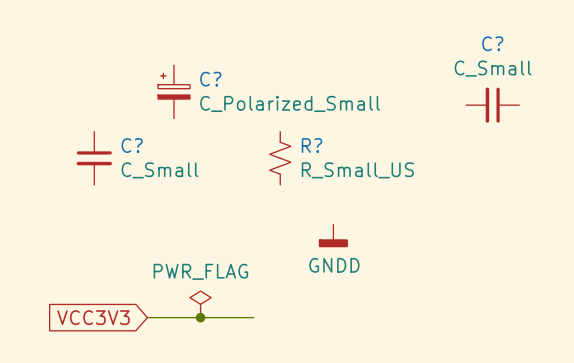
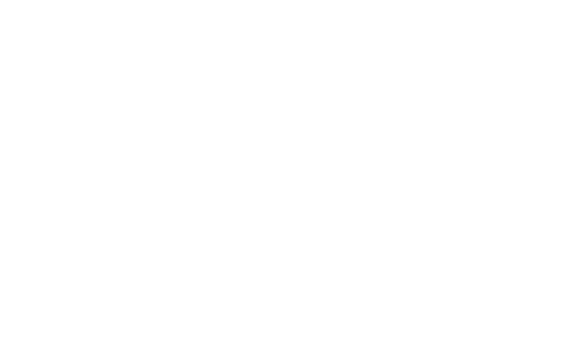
C?: C_Polarized_Small (174, 91) -> none
C?: C_Small (492, 105) -> none
C?: C_Small (94, 158) -> none
R?: R_Small_US (280, 158) -> none
power symbol: GNDD (333, 235) -> none
power symbol: PWR_FLAG (200, 304) -> none
global label: VCC3V3 (93, 317) -> none
wire: (147, 317) (253, 317) -> none
junction: (200, 317) -> none

